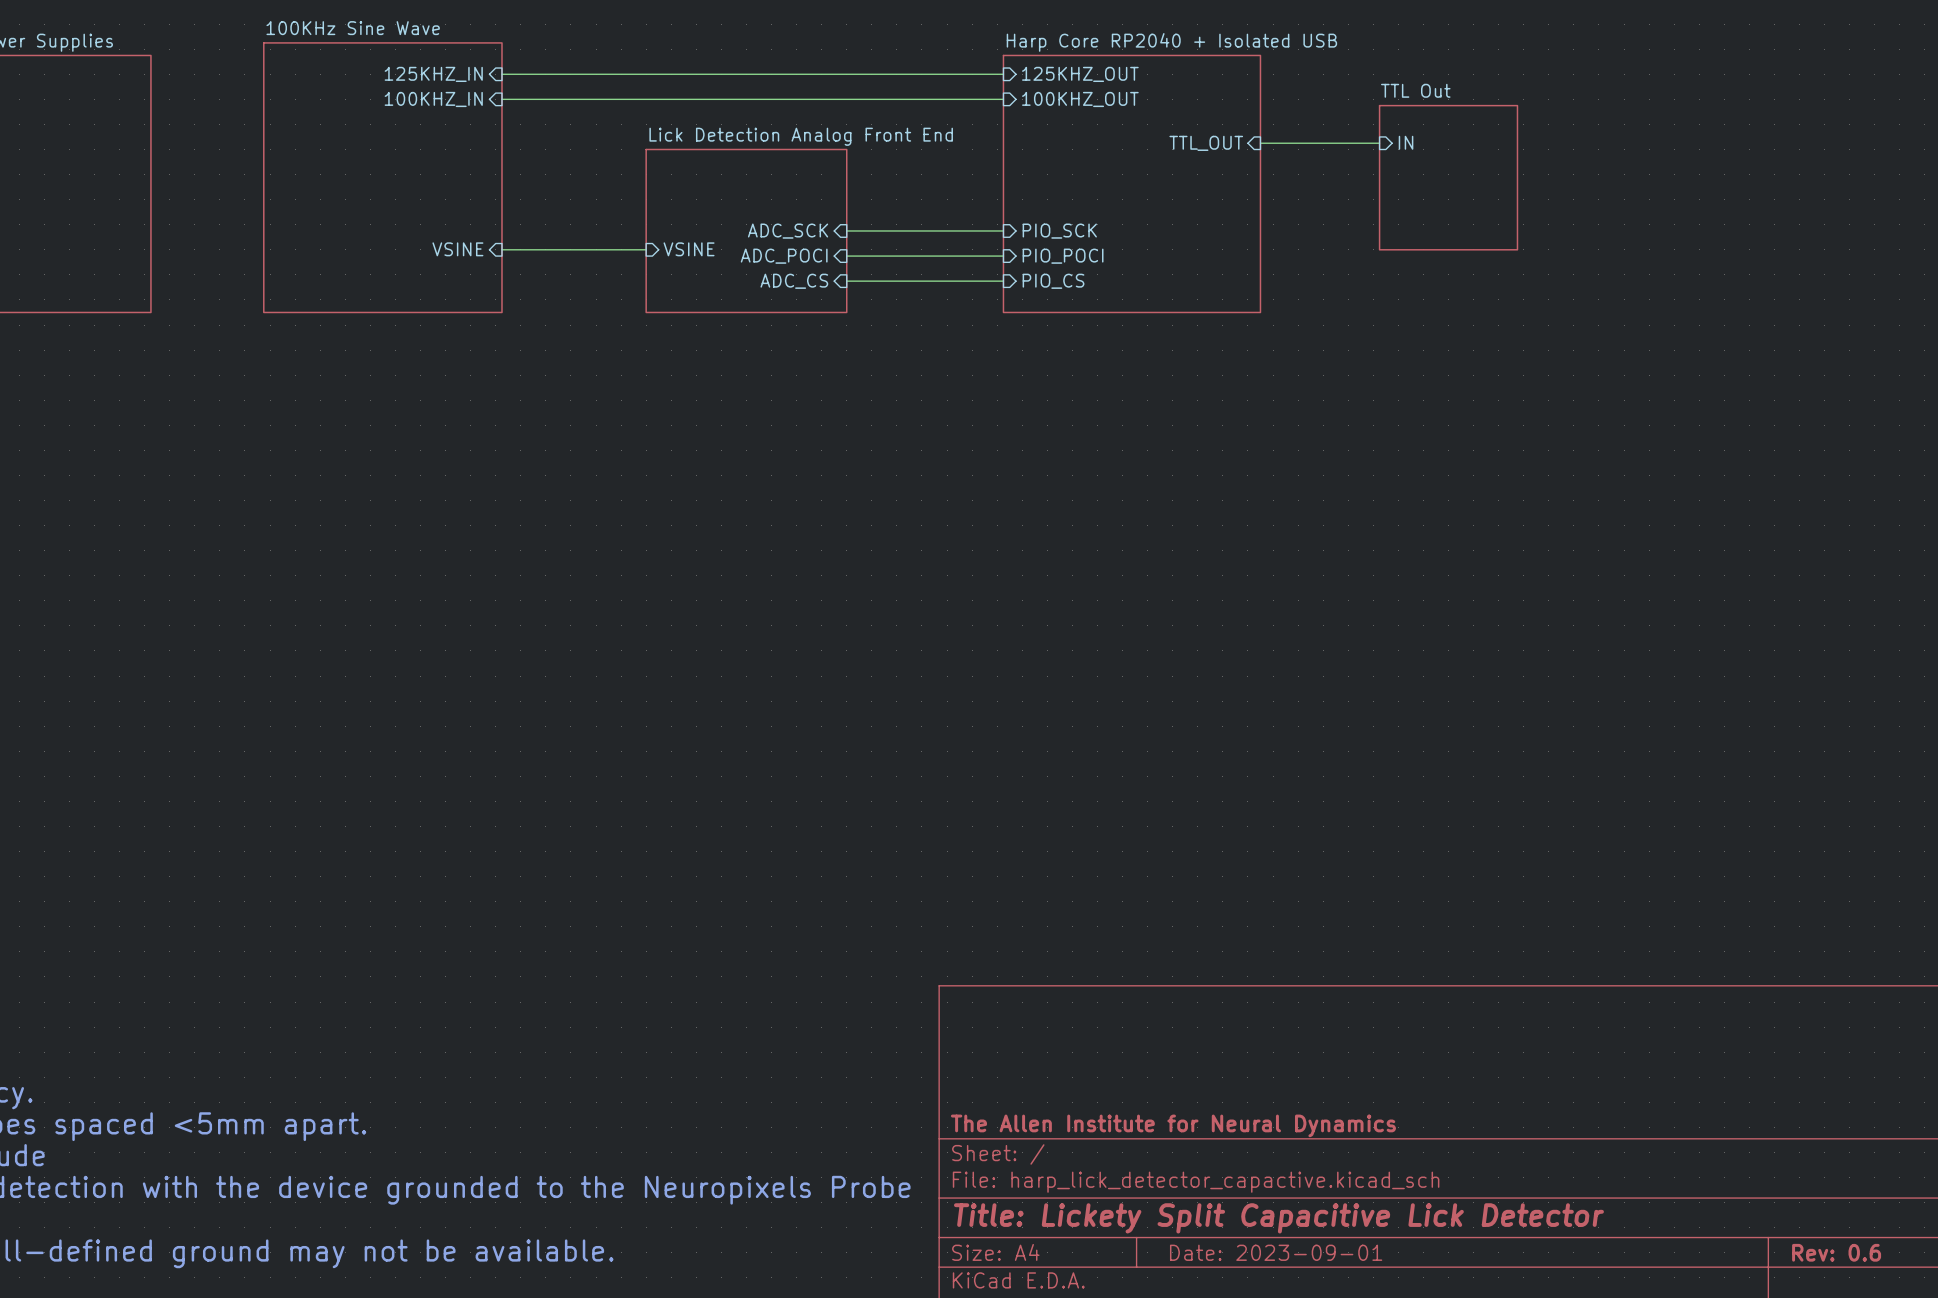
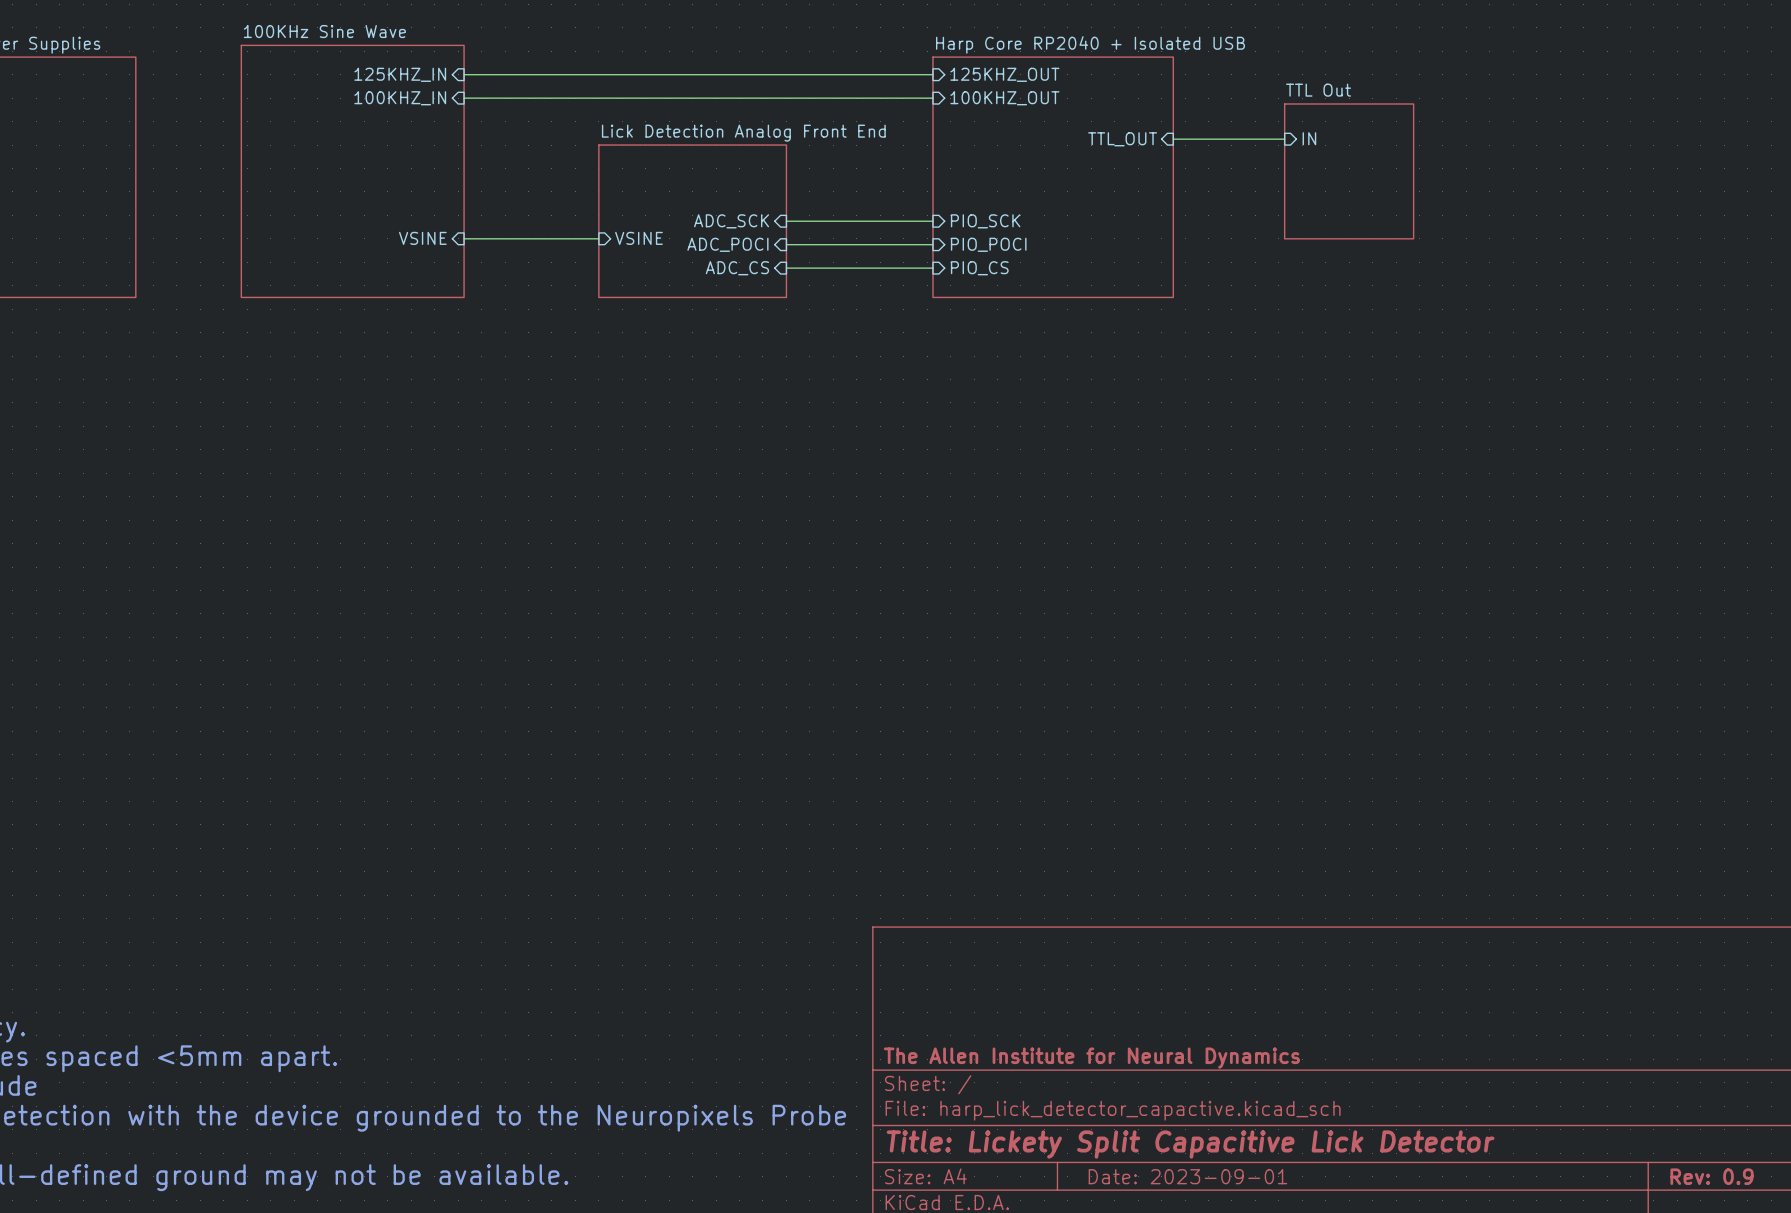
title block: Rev: 0.6 (1836, 1252) -> Rev: 0.9 (1712, 1176)

